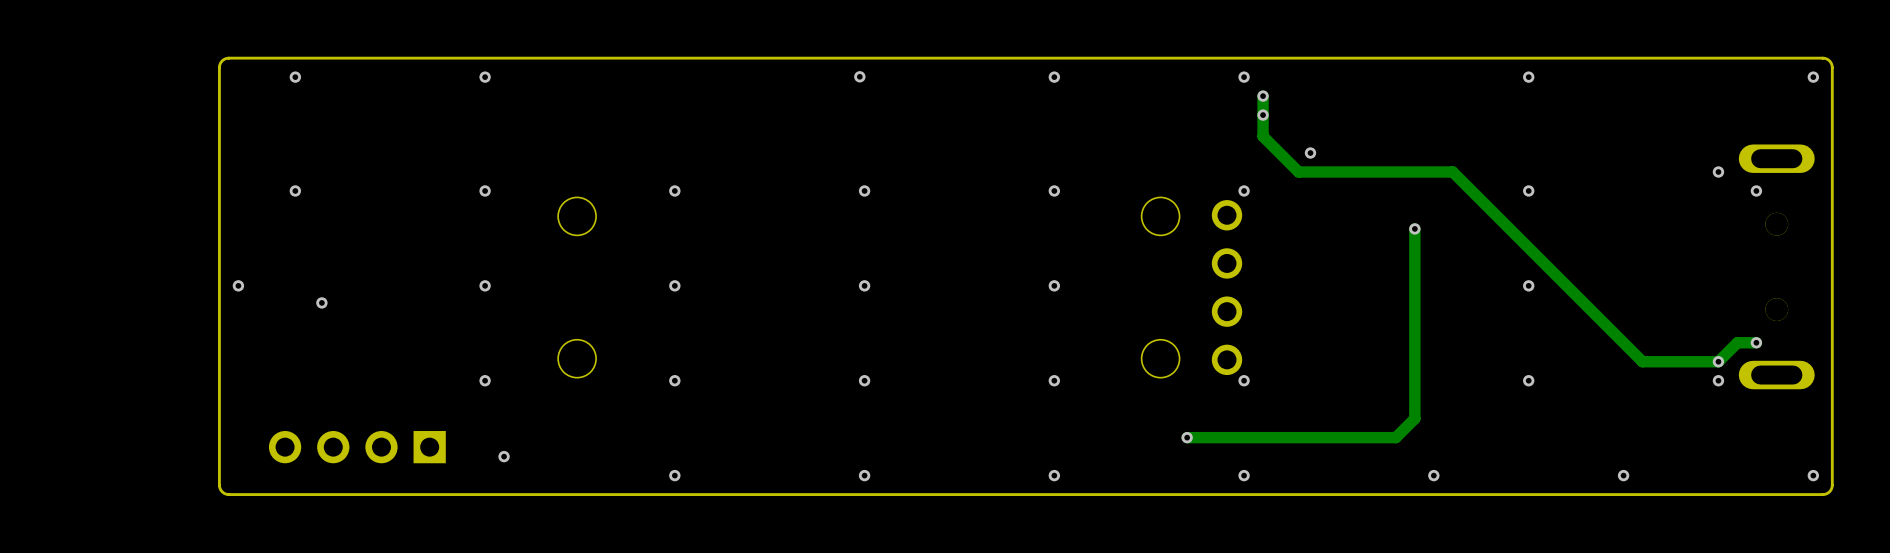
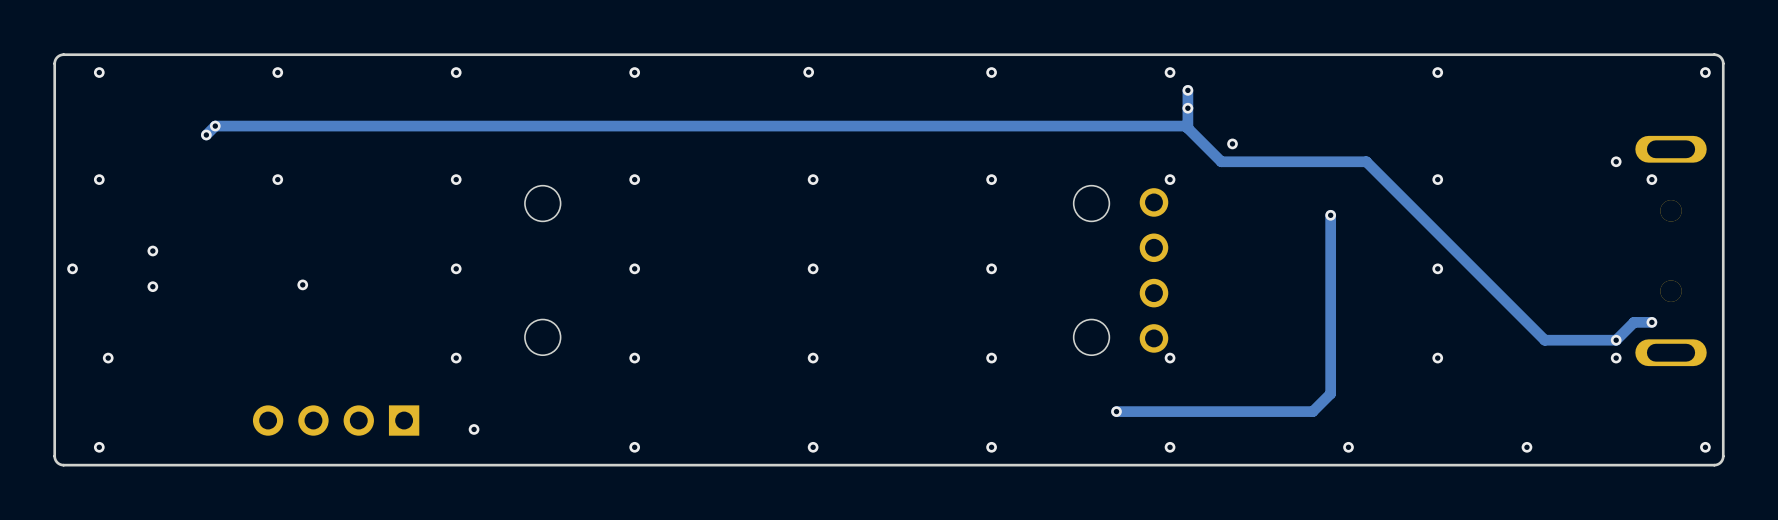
board edge: (228, 58) (222, 60) (219, 67) (219, 485) (222, 491) (228, 494) -> (215, 54) (63, 54) (57, 57) (54, 63) (55, 459) (63, 465) (215, 465)
via: none -> (99, 72)
via: none -> (634, 72)
via: none -> (215, 126)
track: none -> (1187, 128) (1185, 126) (215, 126) (206, 134)
via: none -> (206, 134)
via: none -> (99, 179)
via: none -> (152, 250)
via: none -> (72, 268)
via: (238, 285) -> none
via: none -> (152, 286)
via: none -> (108, 358)
via: none -> (99, 447)

